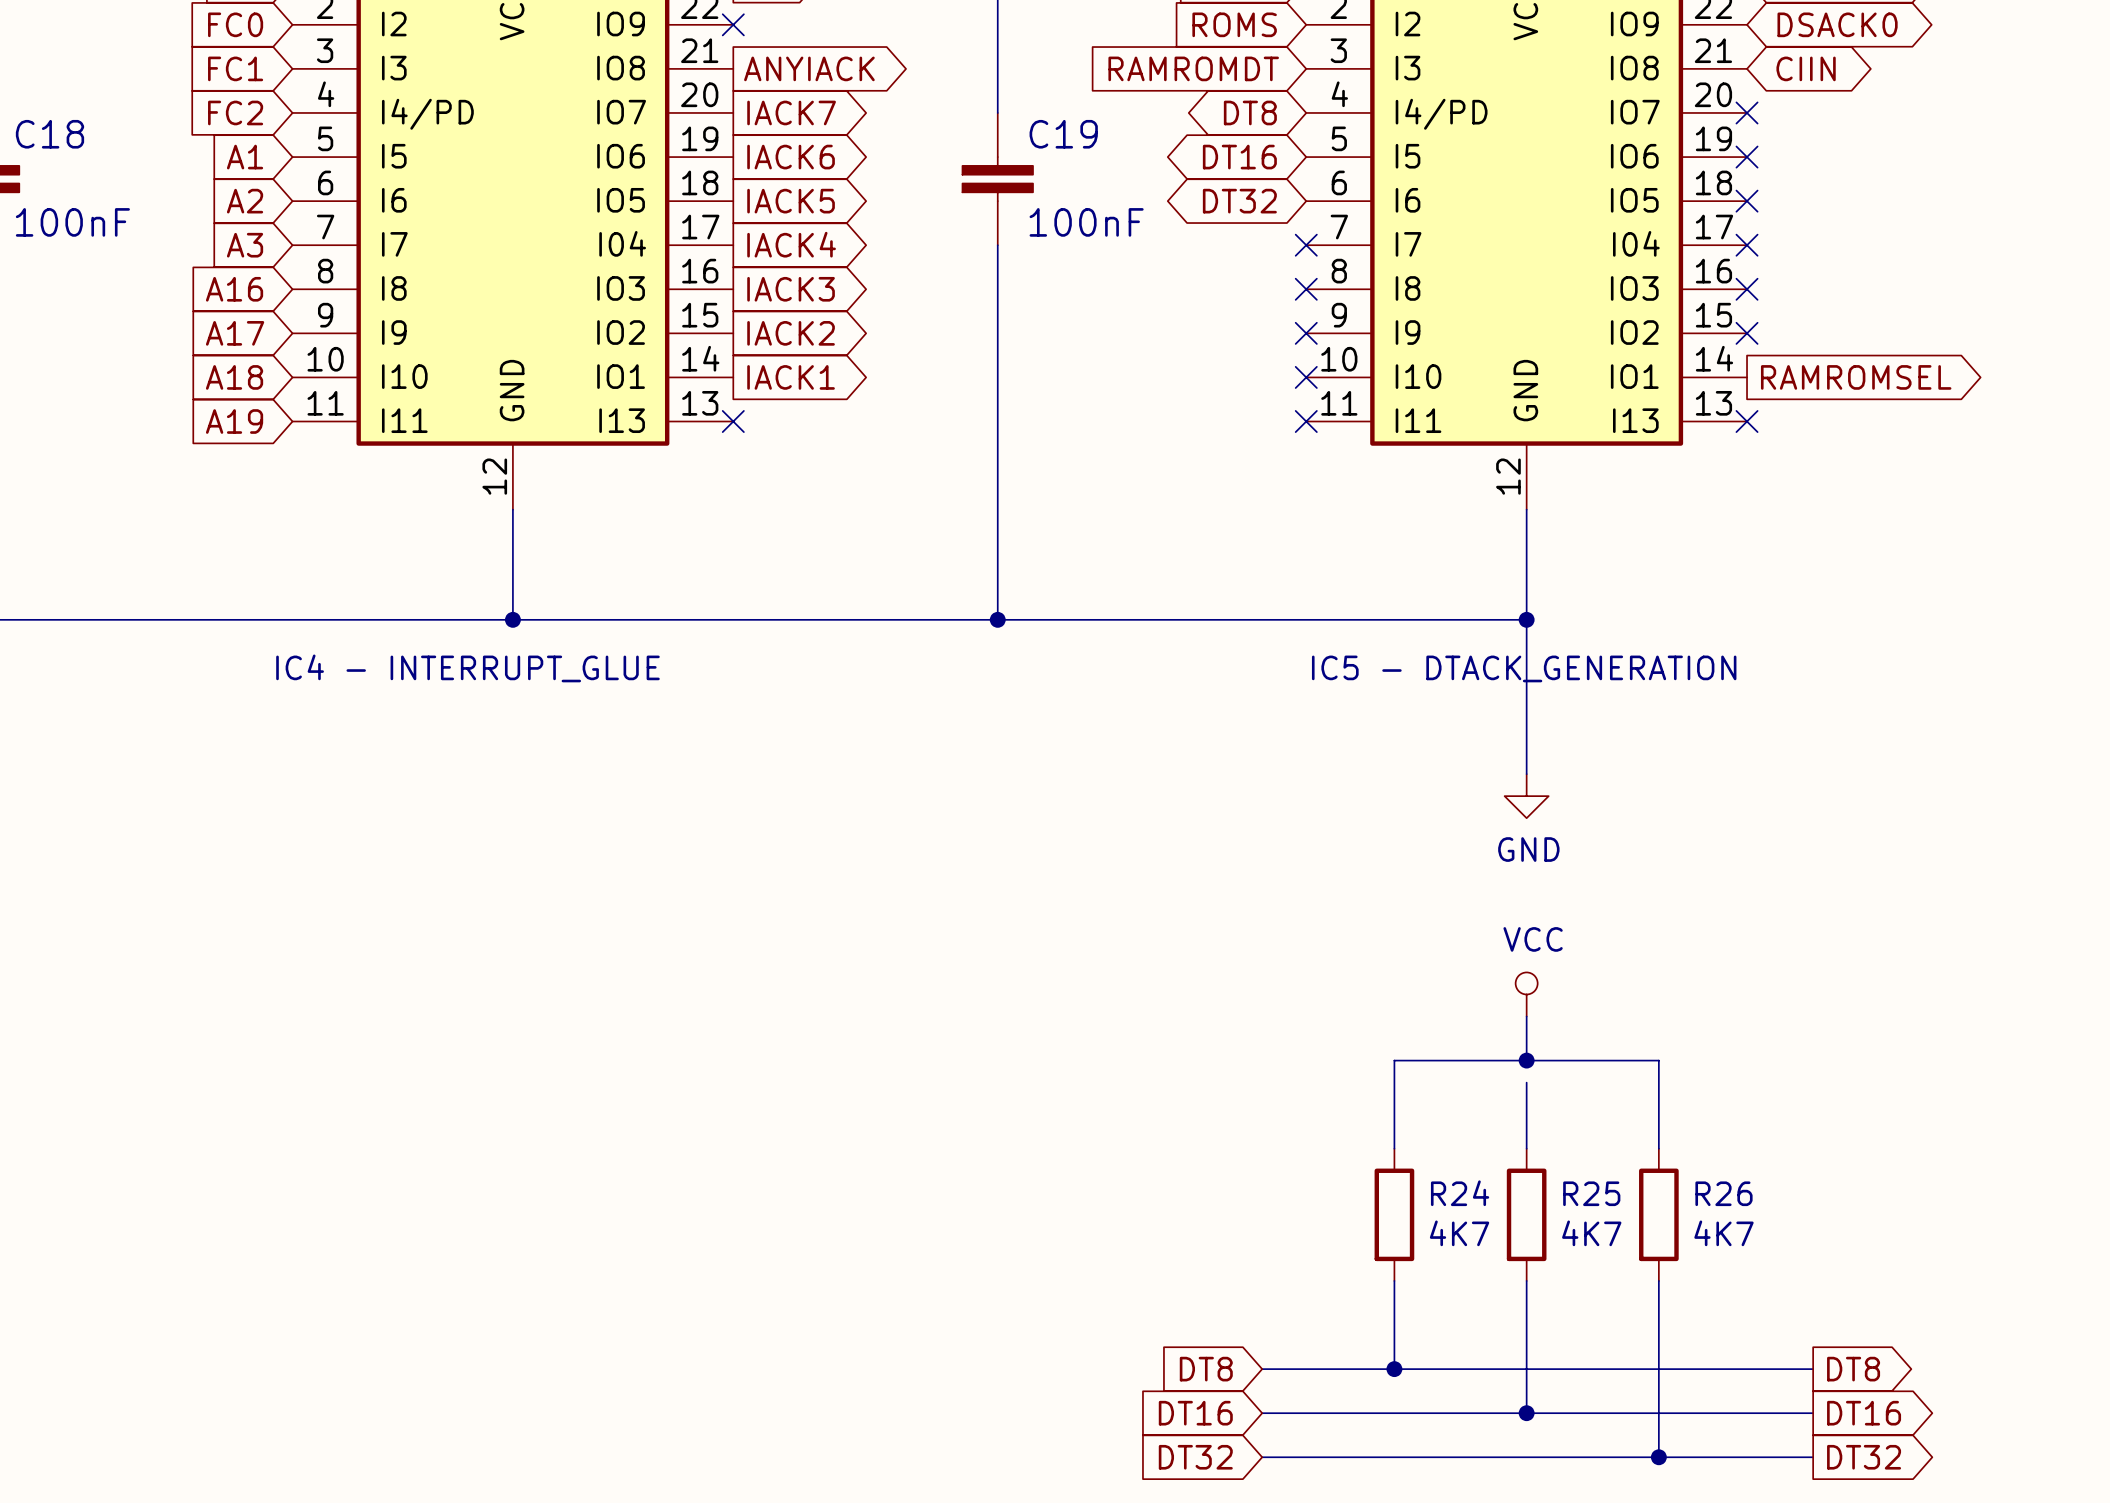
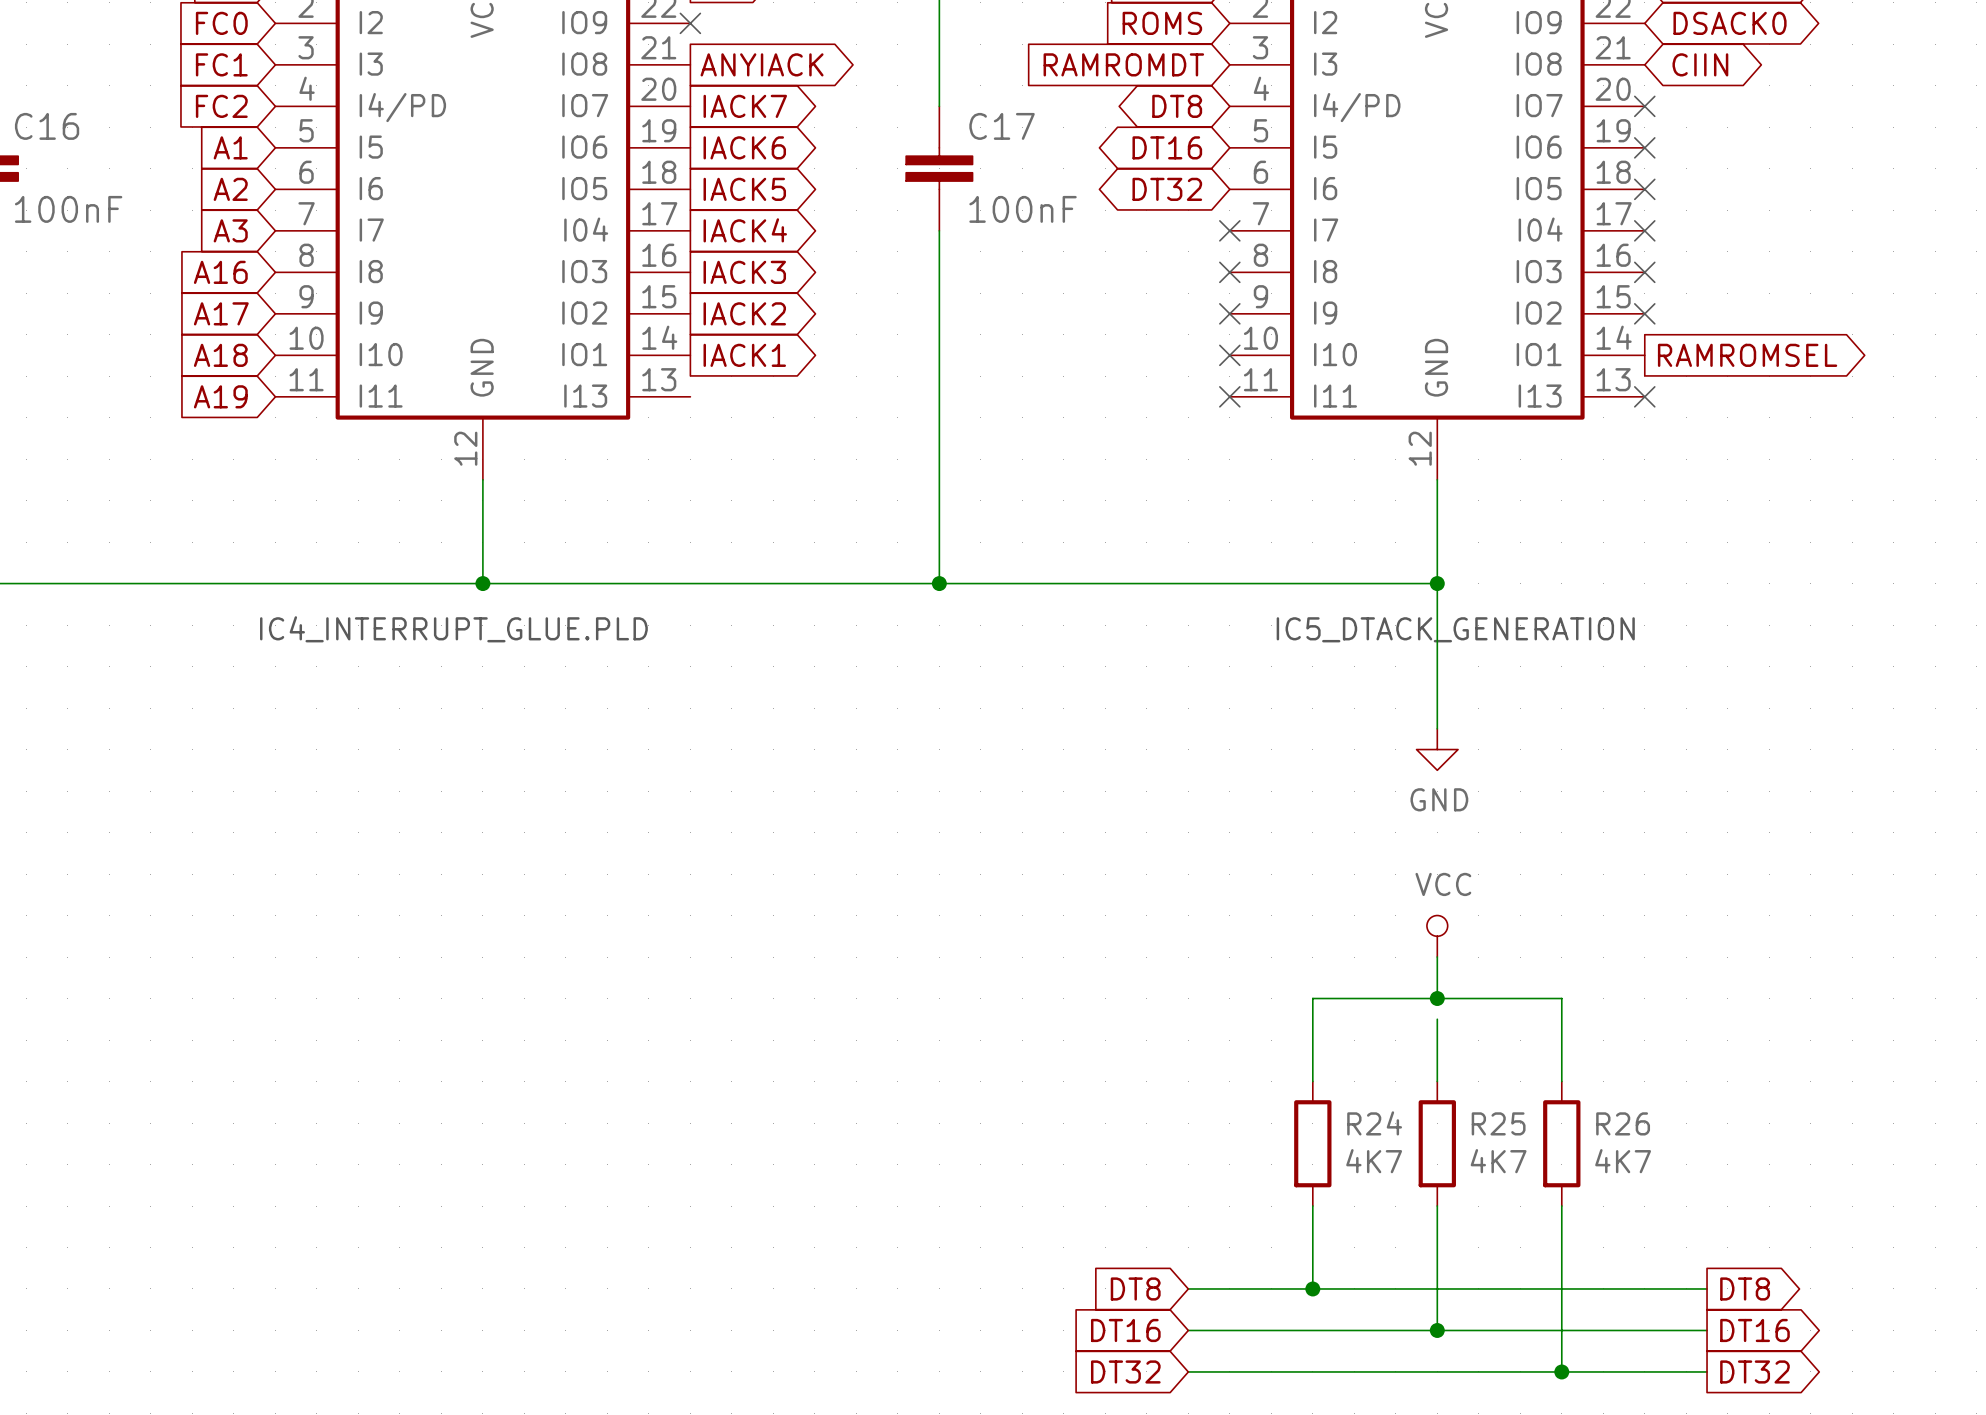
C18 name: C18 (49, 134) -> C16 (47, 126)
C19 name: C19 (1063, 134) -> C17 (1002, 126)
no-connect mark: (733, 421) -> none
text: IC4 - INTERRUPT_GLUE (467, 668) -> IC4_INTERRUPT_GLUE.PLD (453, 629)
text: IC5 - DTACK_GENERATION (1524, 668) -> IC5_DTACK_GENERATION (1455, 629)

